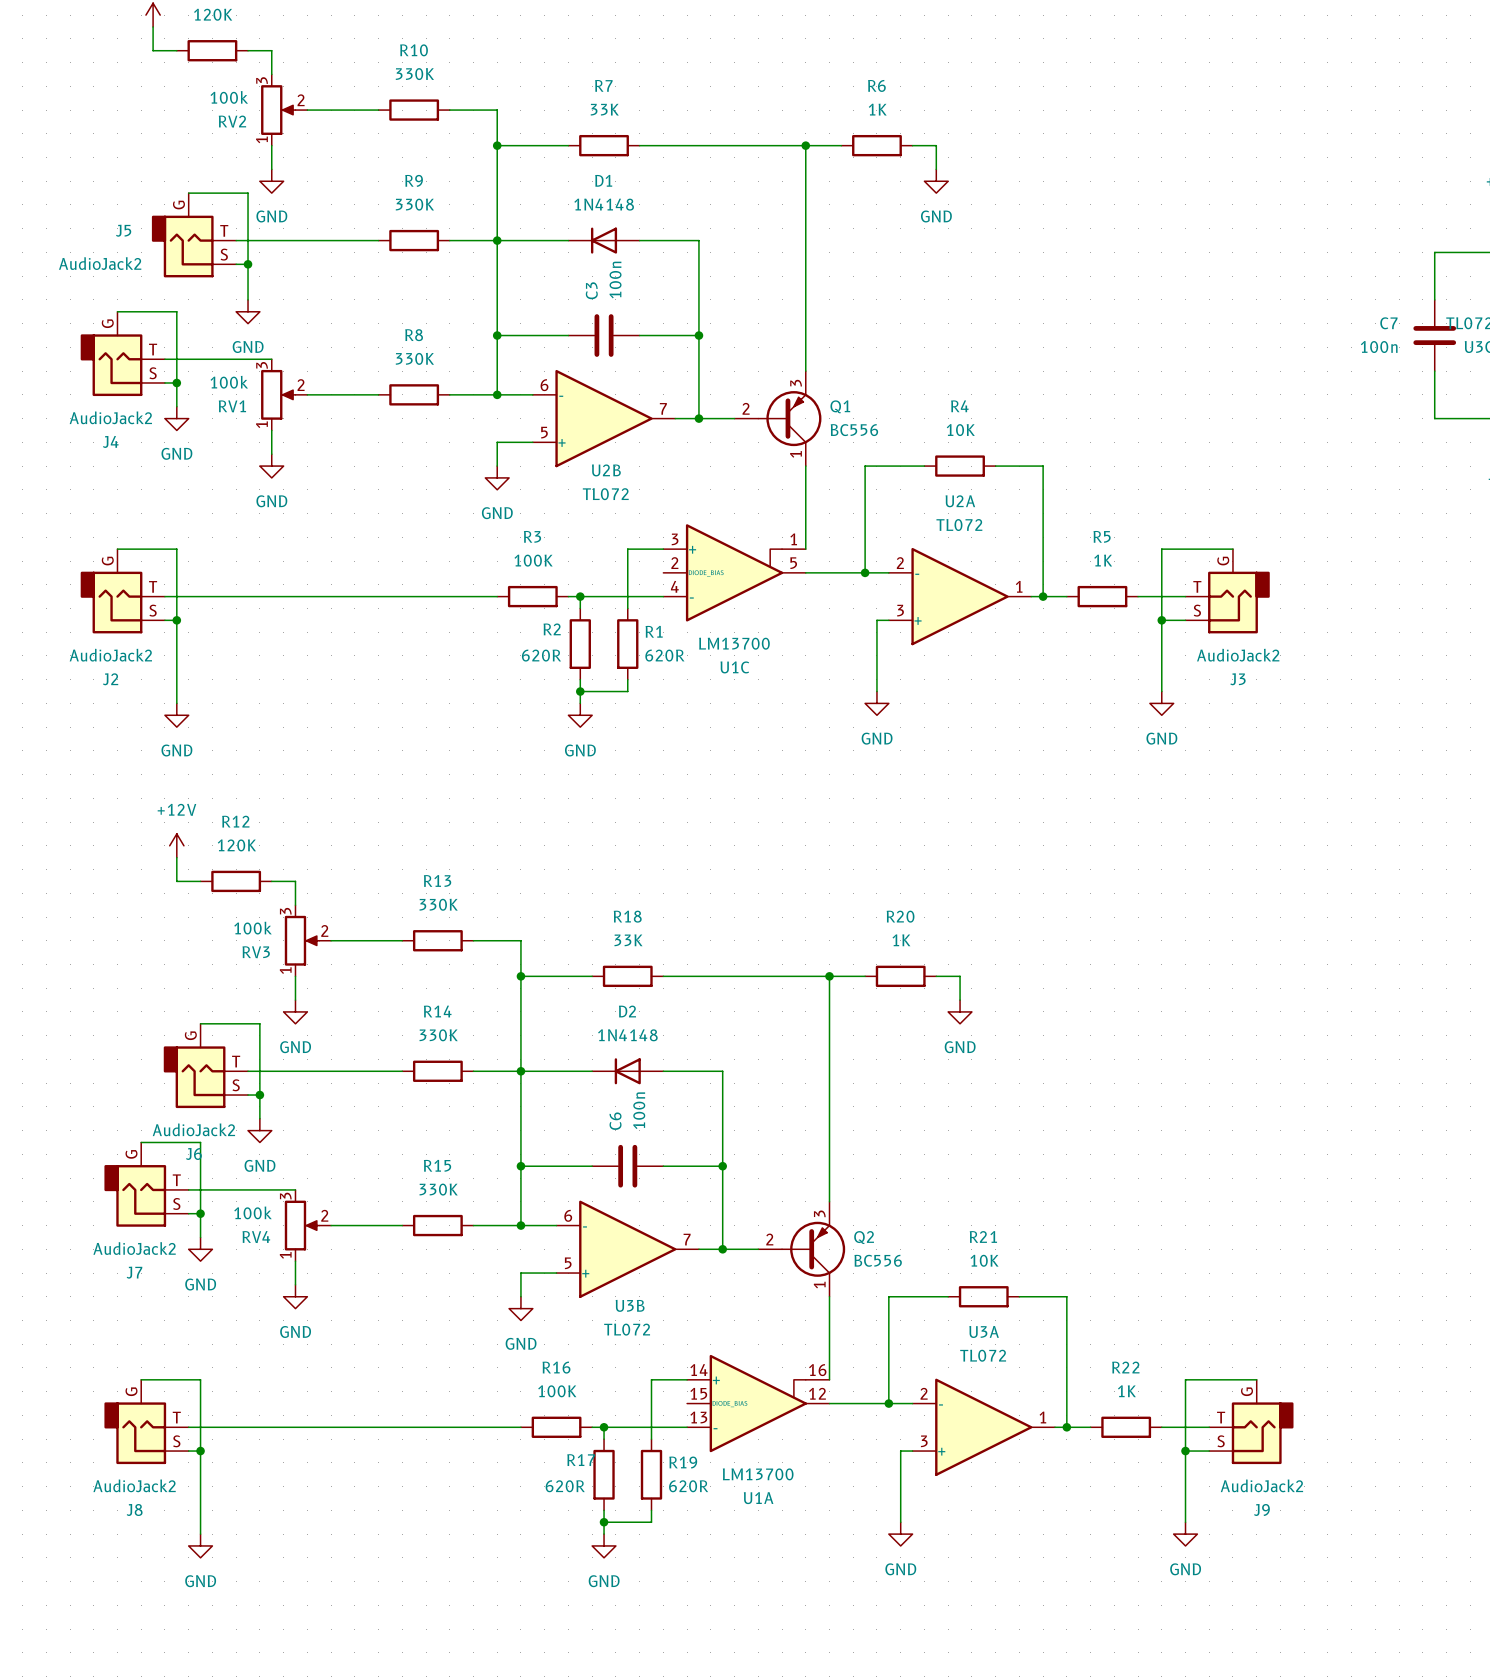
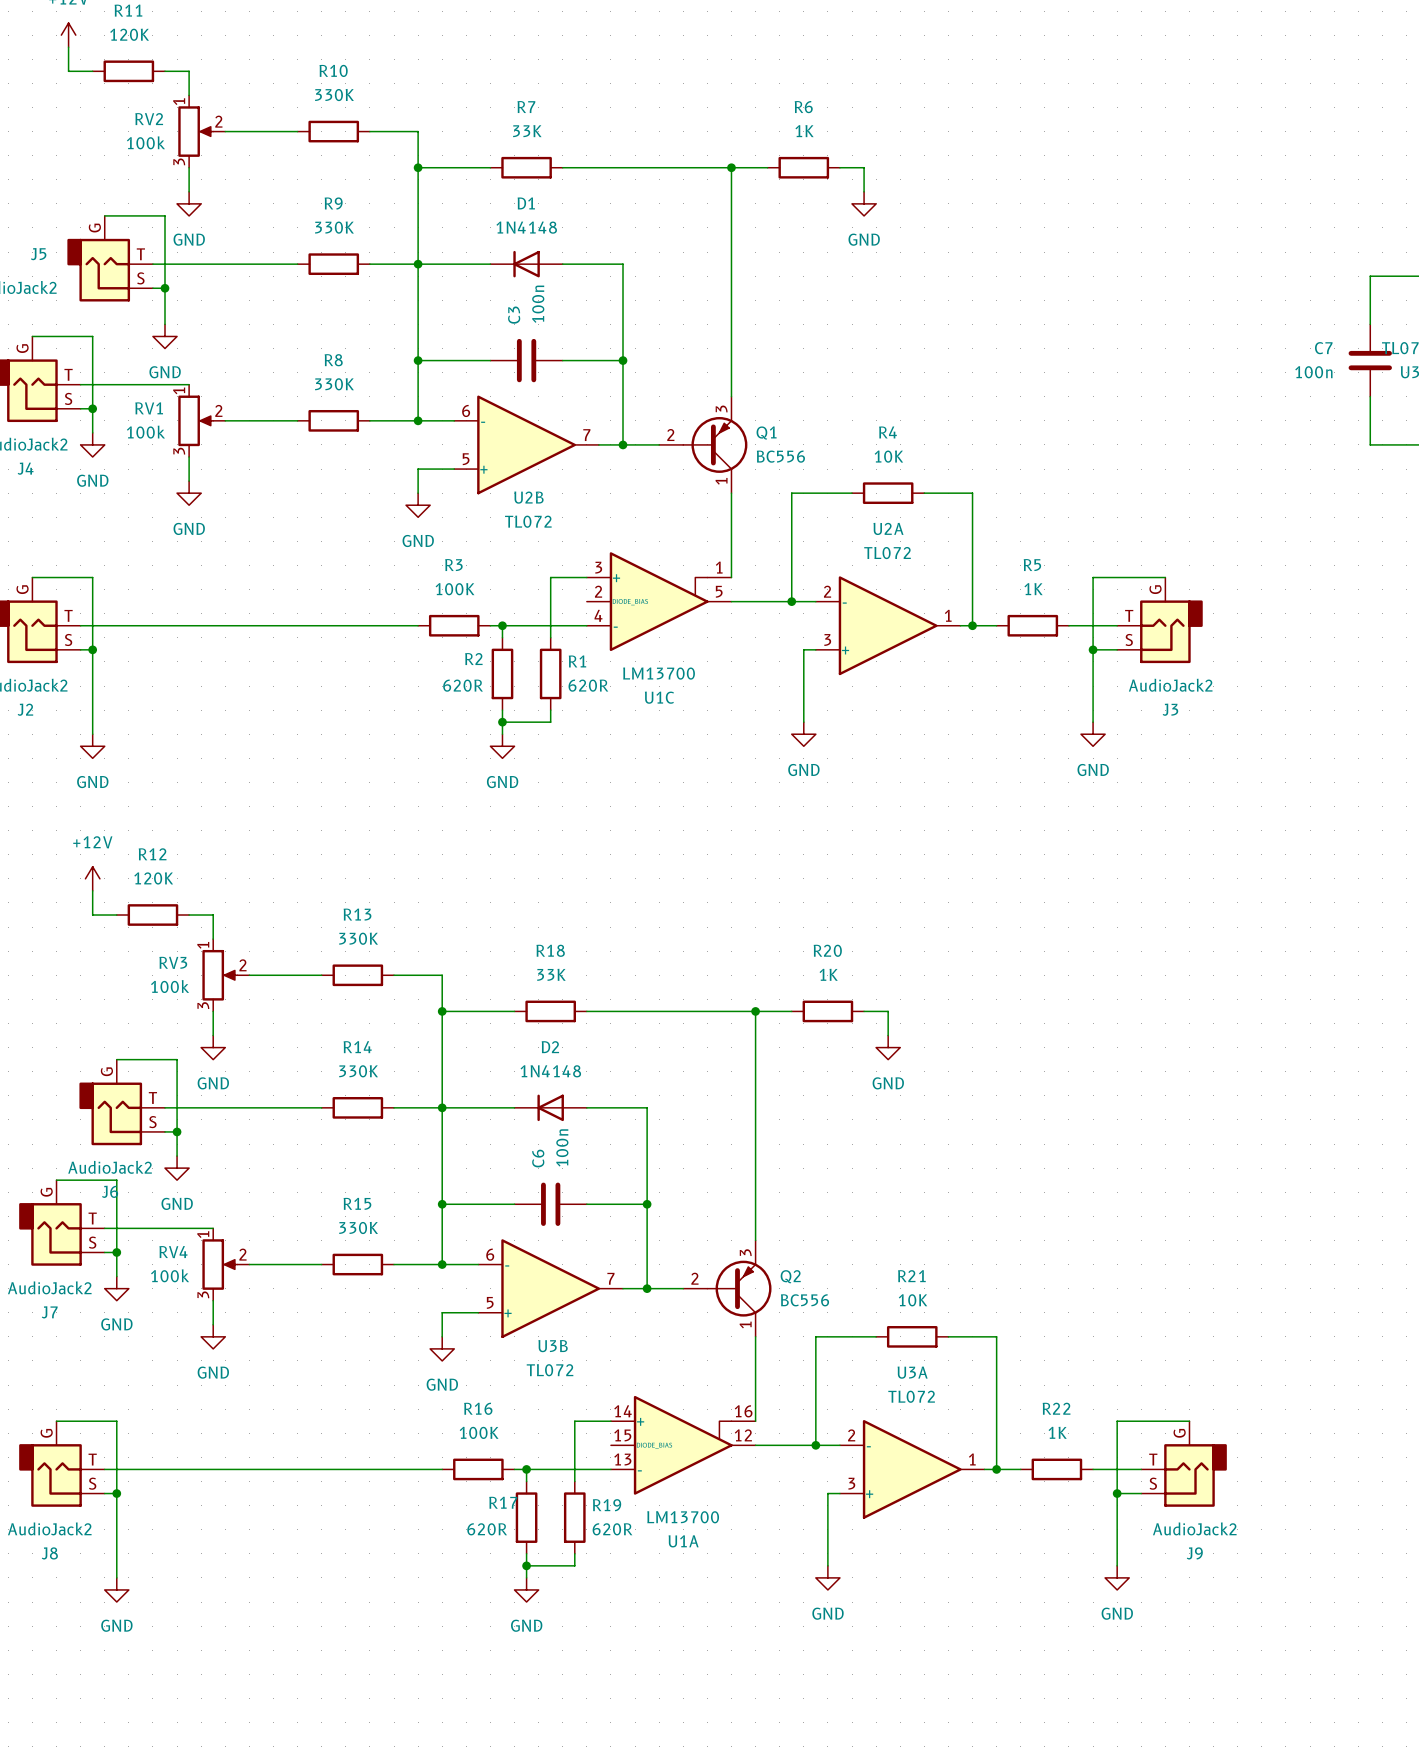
RV2 flip: as is (278, 110) -> up-down (195, 131)
RV1 flip: as is (278, 394) -> up-down (195, 420)
RV3 flip: as is (302, 940) -> up-down (219, 975)
RV4 flip: as is (302, 1225) -> up-down (219, 1264)

